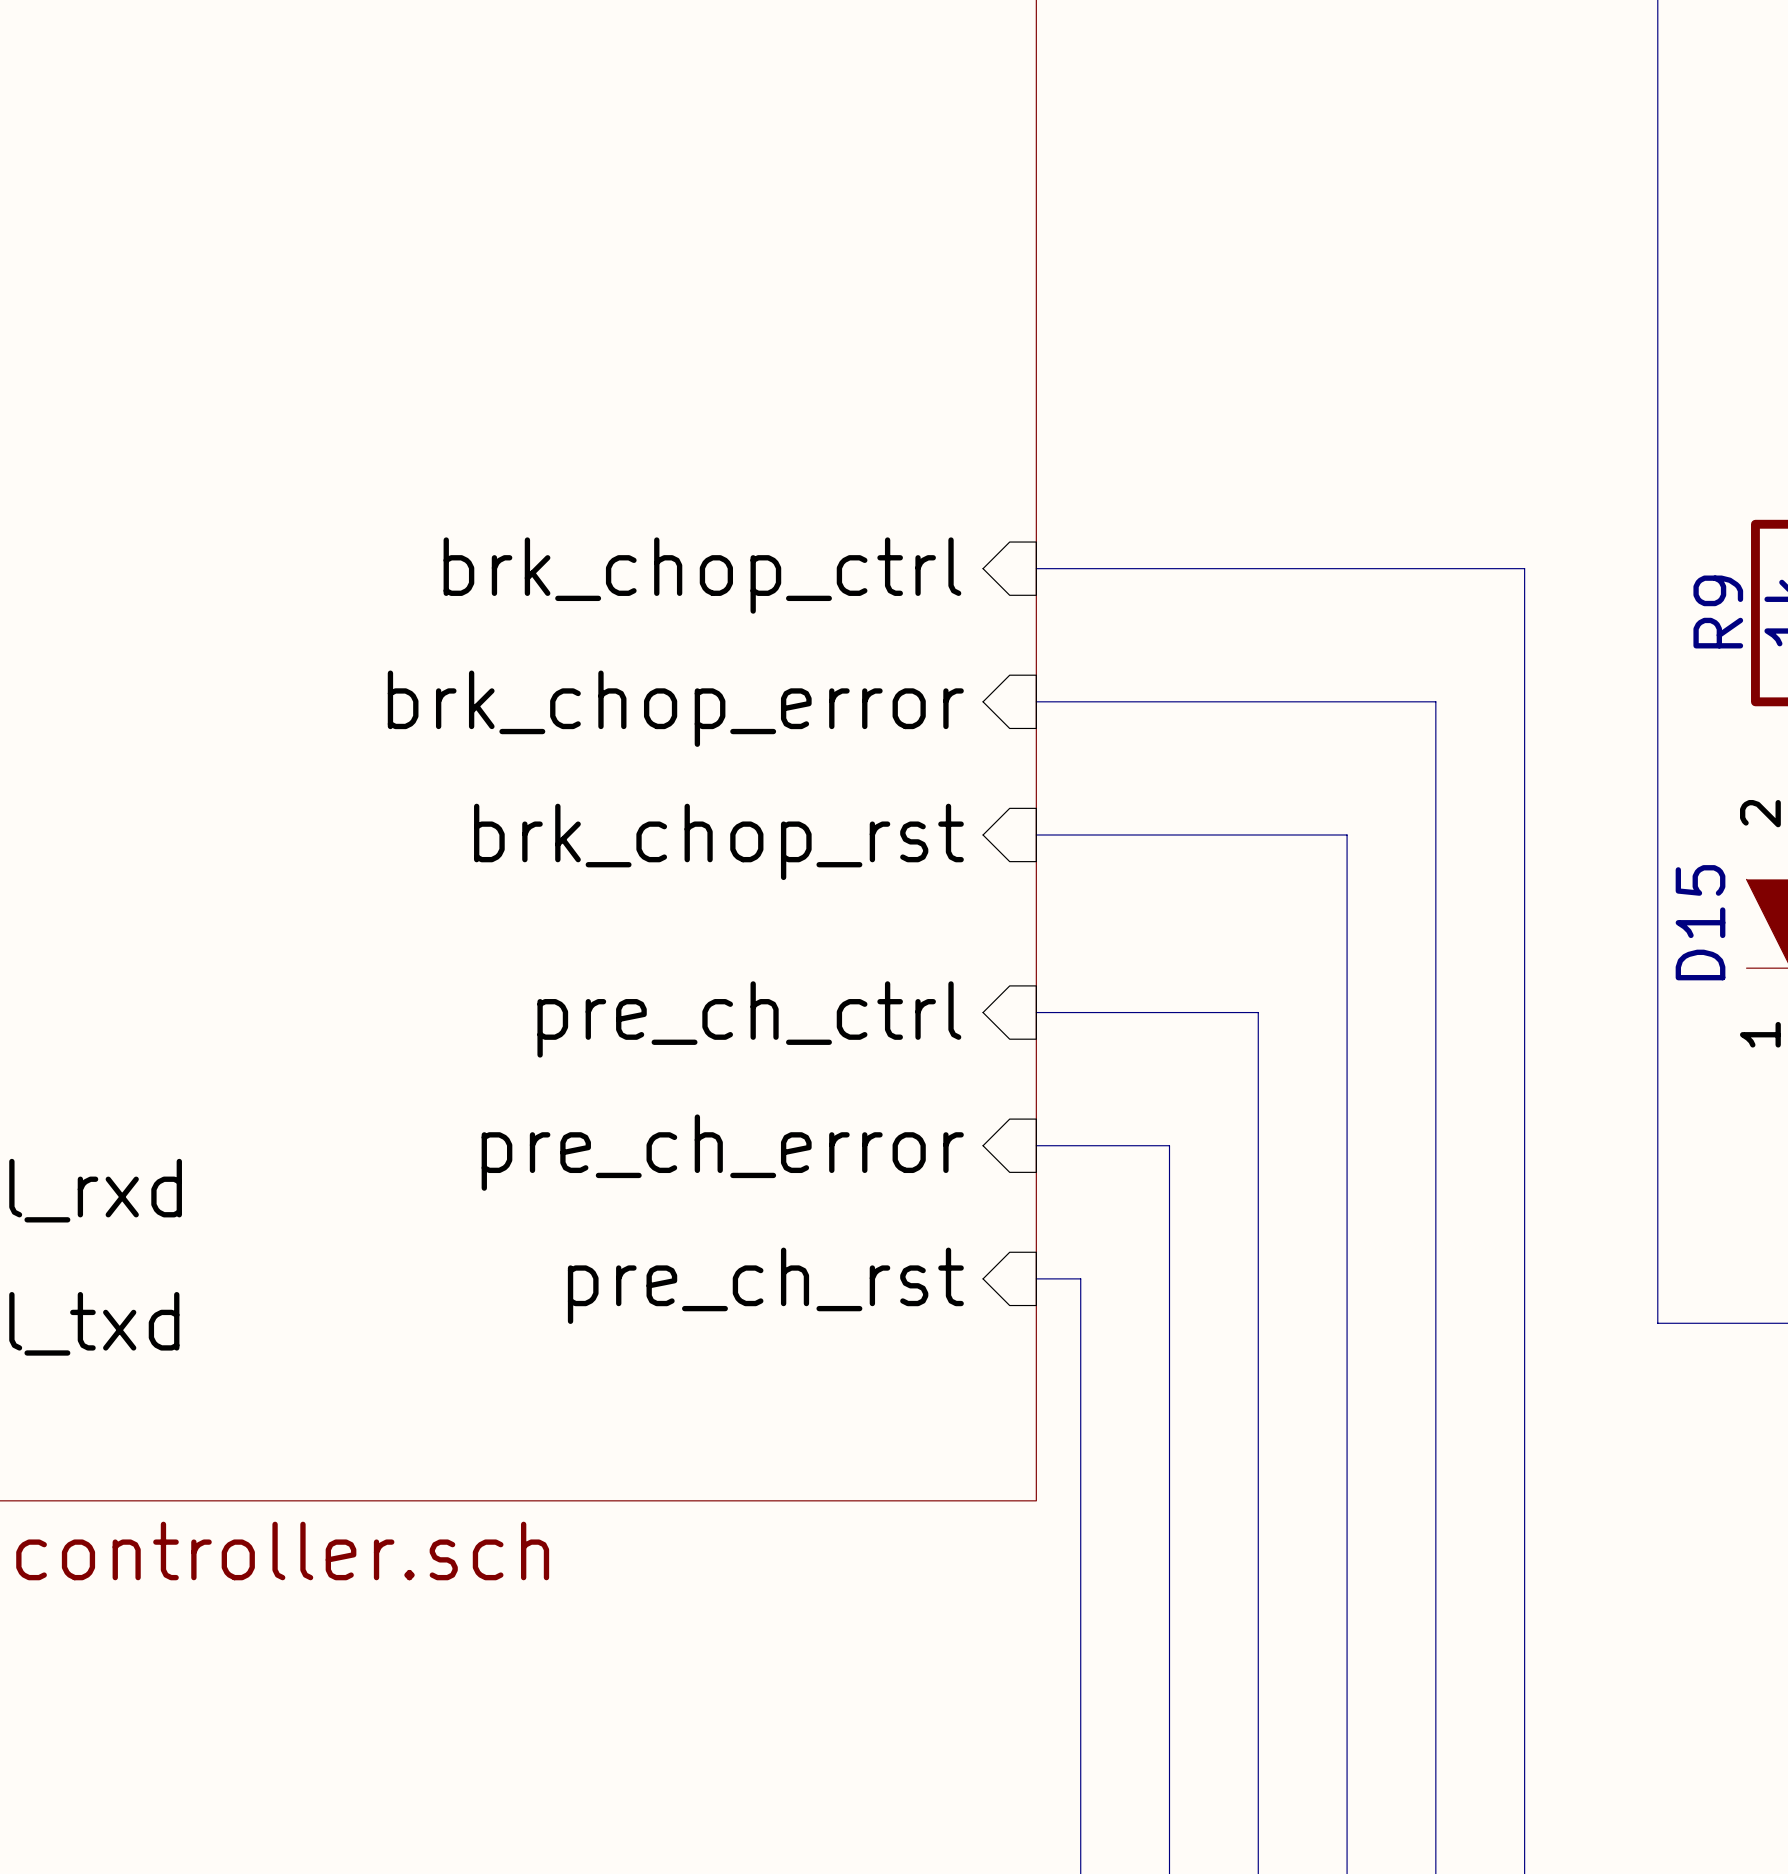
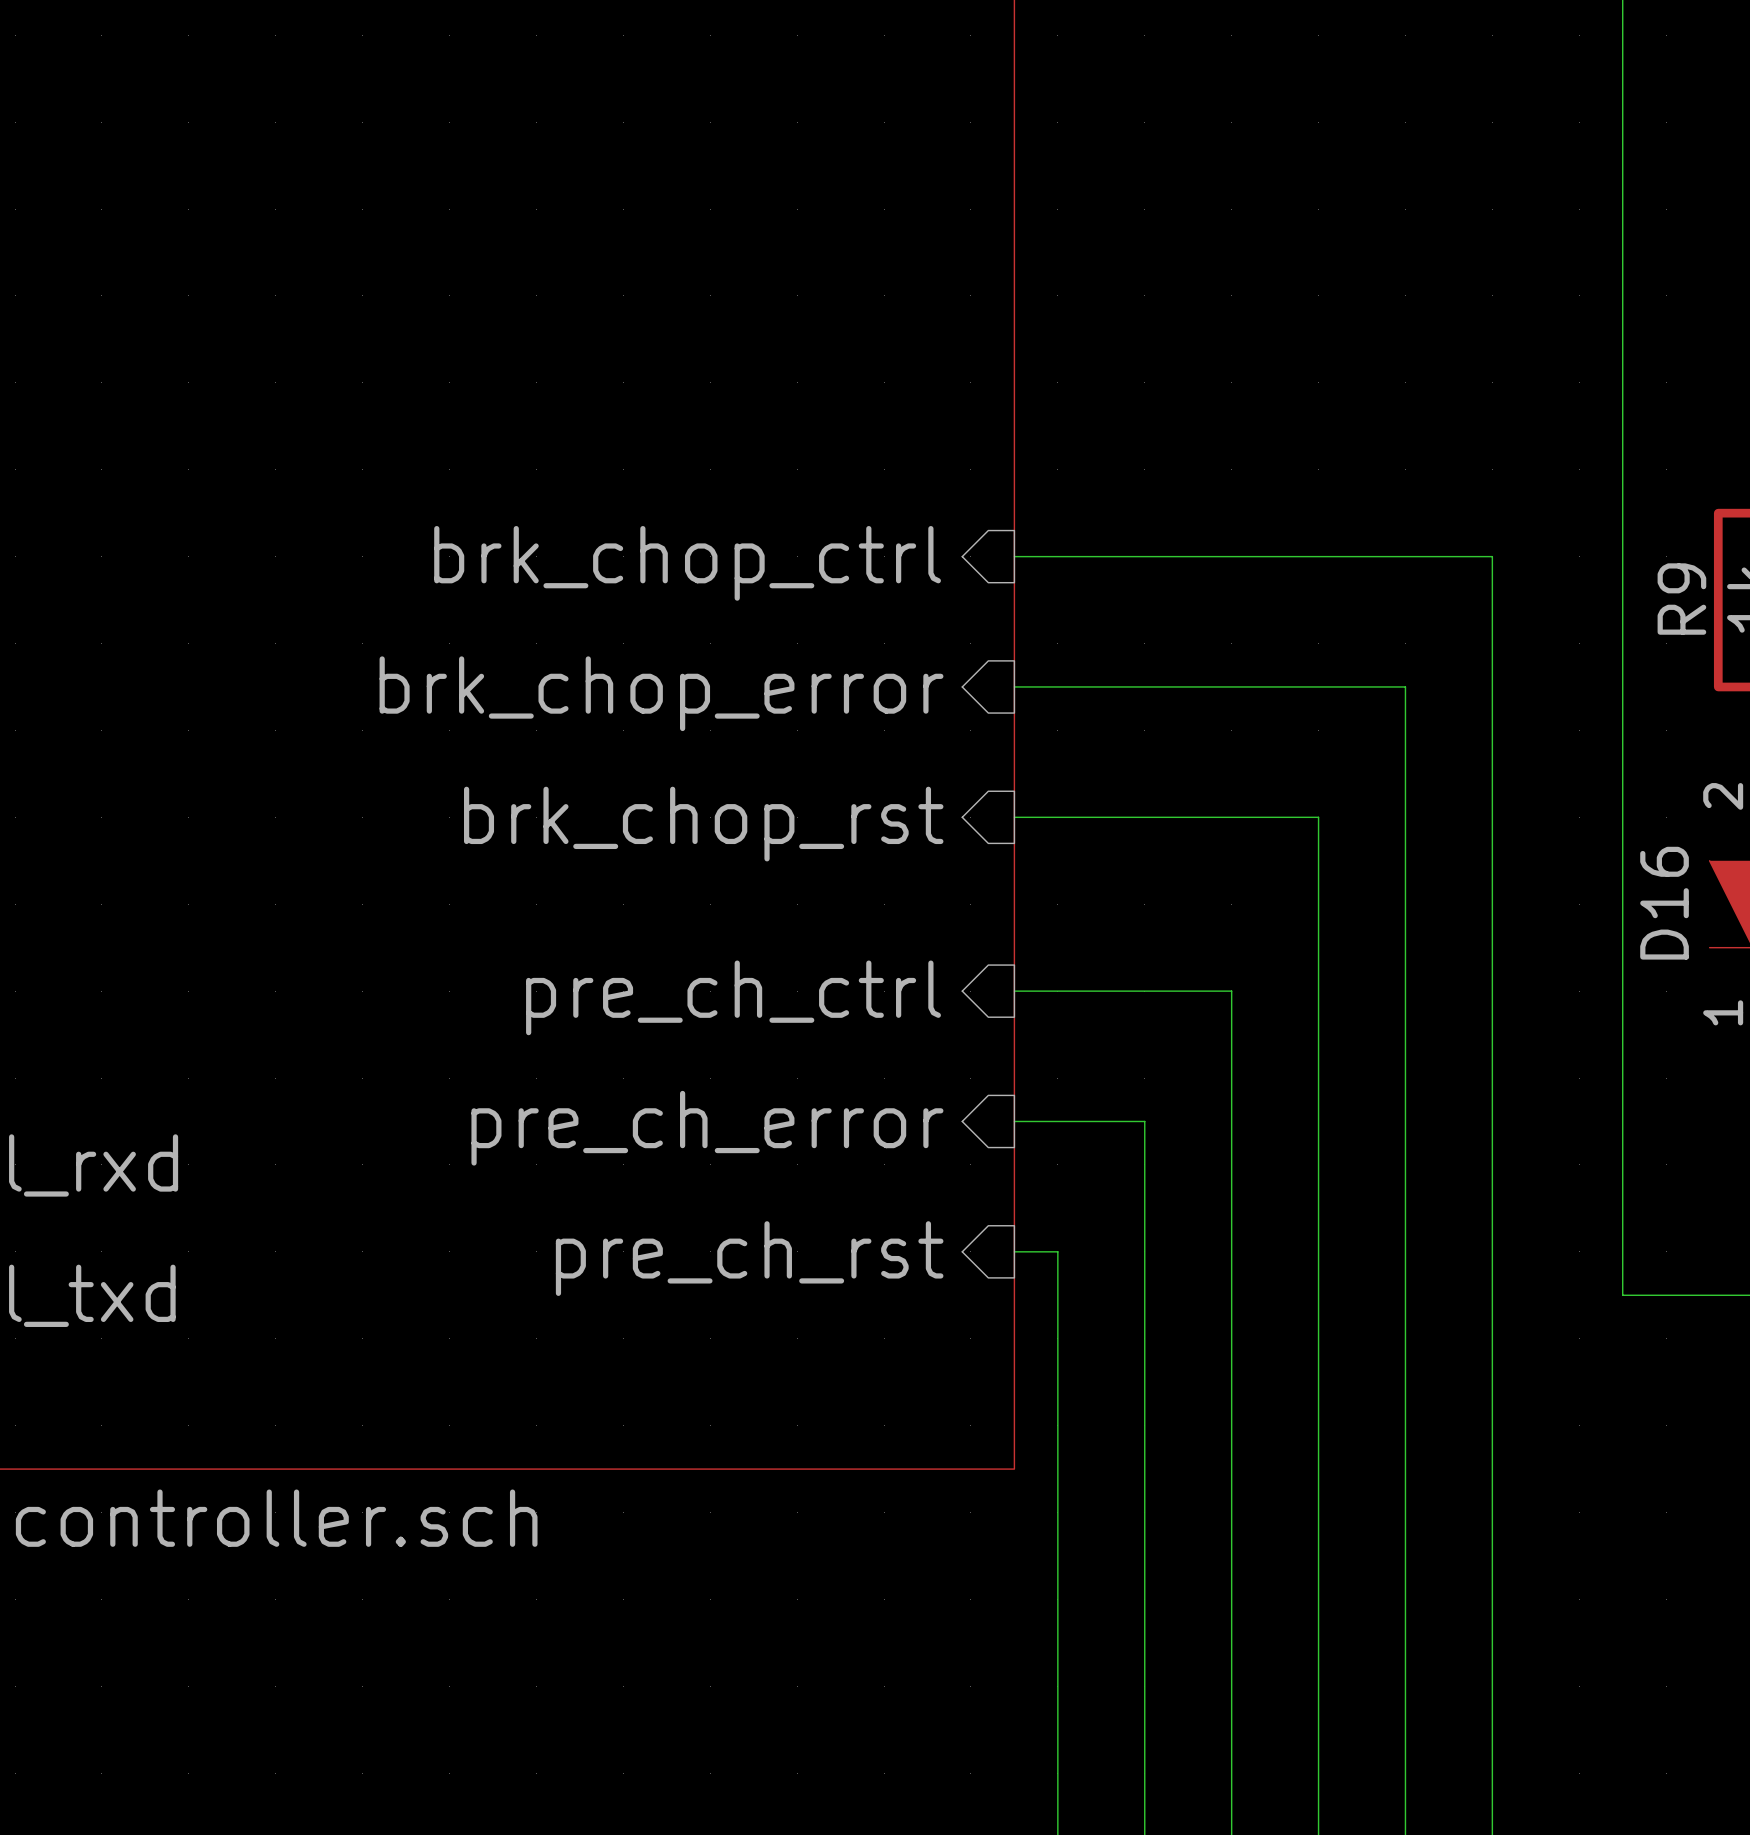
D15 name: D15 (1700, 922) -> D16 (1664, 903)

